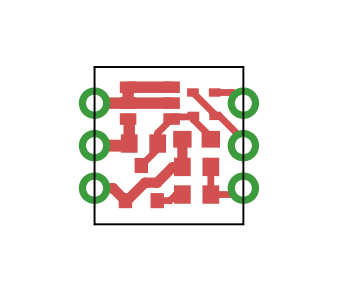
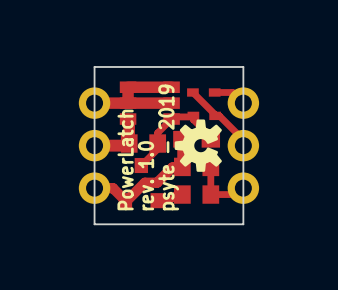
drawing: none -> [174, 119, 222, 172]
text: none -> psyte - 2019 (168, 147)
text: none -> PowerLatch (125, 159)
text: none -> rev. 1.0 (146, 175)

